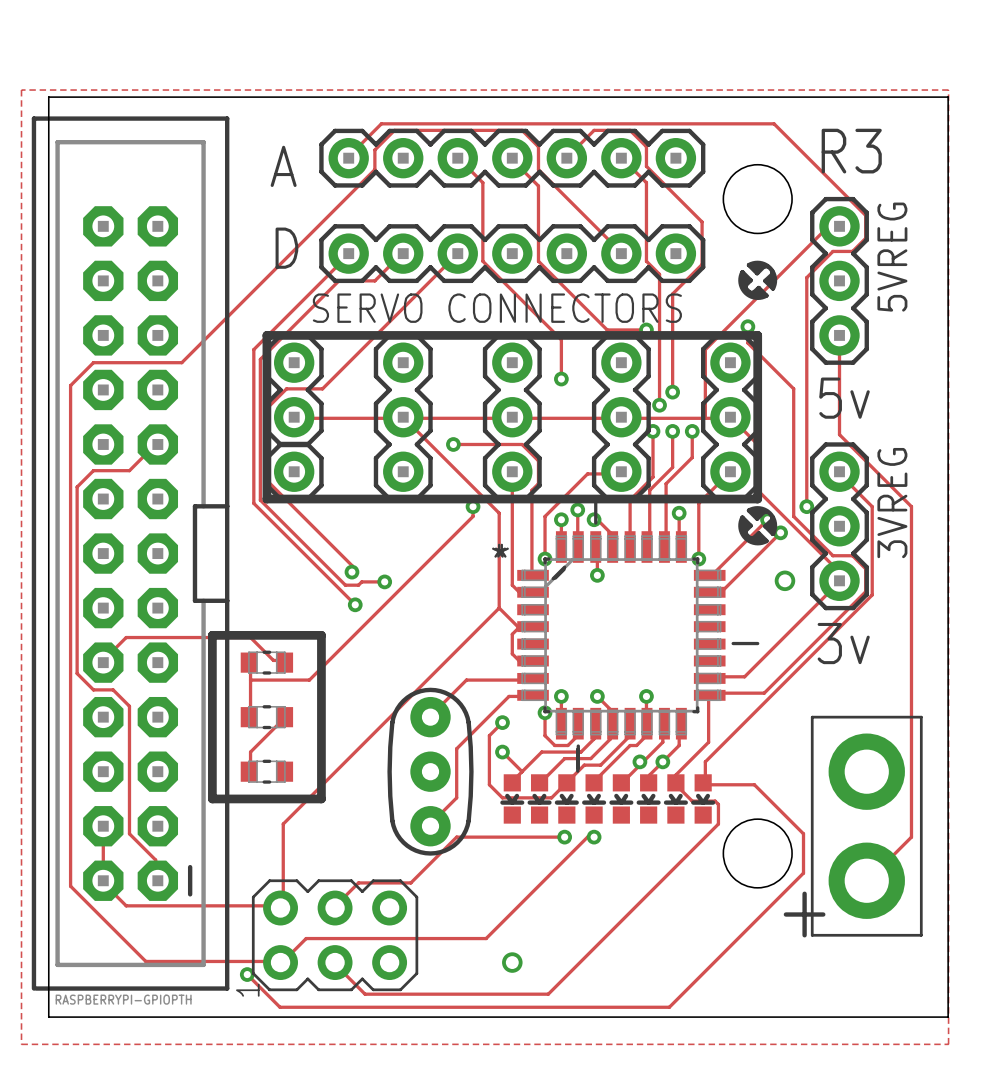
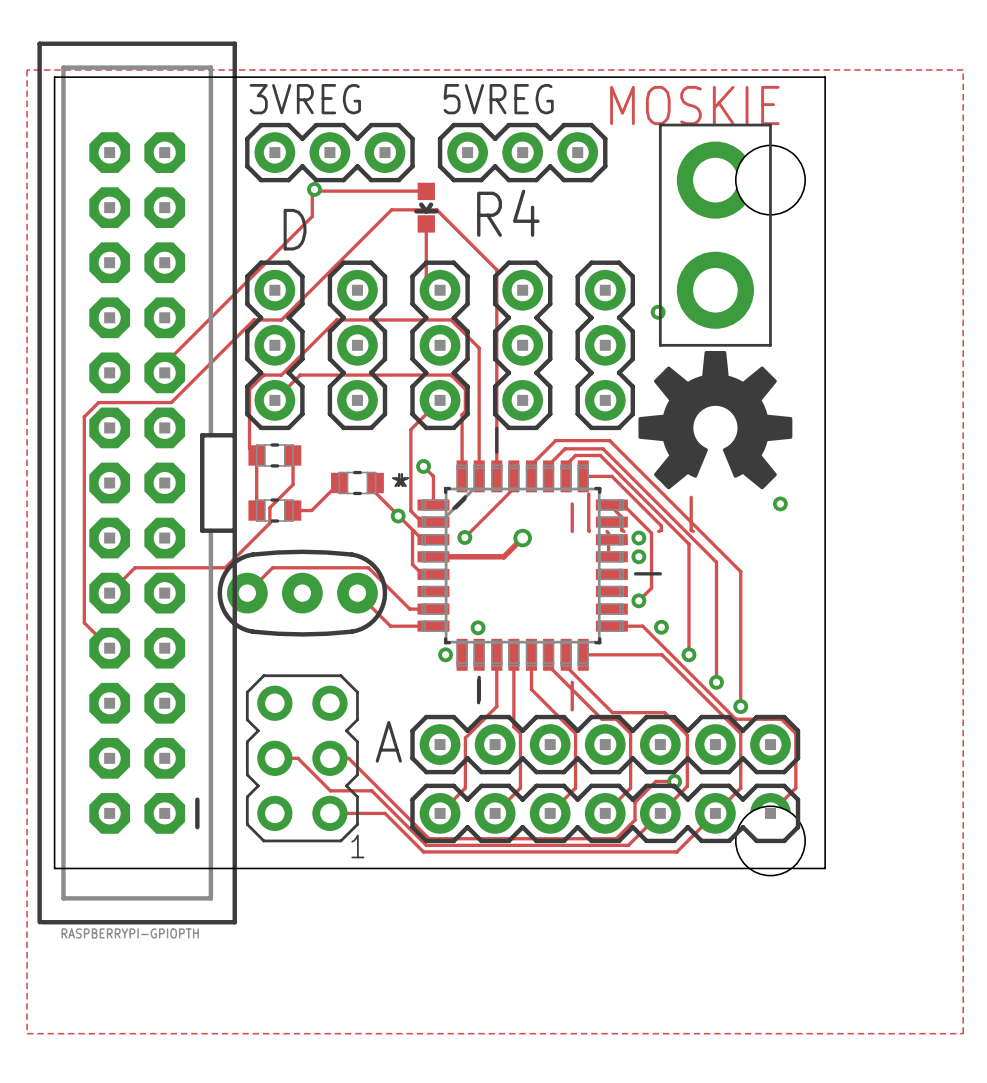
board edge: (811, 97) (948, 97) (948, 1017) (48, 1017) (48, 880) -> (825, 77) (825, 868) (54, 868)
text: none -> MOSKIE (694, 105)
text: R3 (851, 151) -> none
track: (348, 158) (381, 123) (774, 123) (865, 215) (865, 238) (852, 251) (832, 251) (806, 277) (806, 506) -> none
track: (457, 158) (482, 182) (482, 261) (561, 339) (561, 379) -> none
track: (512, 158) (538, 186) (538, 261) (607, 329) (646, 329) -> none
part: (512, 158) -> none
track: (566, 158) (594, 130) (630, 130) (646, 146) (646, 166) (702, 221) (702, 264) (672, 293) (672, 392) -> none
track: (621, 158) (646, 182) (646, 261) (659, 274) (659, 405) -> none
text: A (283, 166) -> none
track: none -> (314, 189) (312, 192) (312, 216) (164, 364) (164, 372)
via: none -> (314, 189)
track: none -> (313, 191) (426, 191)
part: none -> (426, 207)
track: (839, 226) (839, 228) (826, 228) (705, 349) (705, 418) -> none
text: none -> R4 (508, 213)
track: none -> (426, 223) (426, 276) (440, 290)
track: (348, 253) (253, 349) (253, 503) (355, 604) -> none
track: (403, 253) (374, 280) (338, 280) (260, 359) (260, 500) (345, 585) (358, 585) (361, 581) (384, 581) -> none
track: (457, 253) (322, 388) (286, 388) (266, 408) (266, 480) (351, 565) (351, 572) -> none
part: (512, 253) -> none
track: (621, 253) (538, 169) (538, 146) (522, 130) (394, 130) (374, 150) (374, 169) (181, 362) (93, 362) (70, 385) (70, 886) (145, 961) (280, 962) (306, 938) (486, 938) (587, 837) (594, 837) -> none
part: none -> (715, 235)
5VREG name position: 5VREG (892, 257) -> 5VREG (498, 99)
drawing: [738, 260, 778, 301] -> none
5VREG rotation: 0° (839, 280) -> 90° clockwise (522, 152)
5VREG position: (839, 280) -> (522, 152)
text: SERVO CONNECTORS (497, 308) -> none
track: (747, 326) (747, 343) (793, 388) (793, 516) (832, 555) (852, 555) (865, 568) (865, 591) (764, 693) (711, 693) (708, 696) (708, 742) (675, 774) (675, 784) (692, 801) (715, 801) (718, 804) (718, 824) (548, 994) (365, 994) (335, 962) -> none
via: (747, 326) -> none
line: (266, 335) (266, 499) (757, 499) (757, 335) (266, 335) -> none
track: (839, 335) (839, 434) (911, 506) (911, 837) (866, 880) -> none
part: none -> (274, 345)
part: none -> (357, 345)
part: none -> (440, 345)
part: none -> (522, 345)
part: none -> (605, 345)
drawing: none -> [638, 350, 793, 490]
via: (561, 379) -> none
via: (672, 392) -> none
text: 5v (844, 398) -> none
via: (659, 405) -> none
track: none -> (274, 400) (300, 375) (451, 375) (465, 389) (465, 411) (462, 414) (462, 476)
track: (294, 417) (403, 417) (499, 513) (499, 608) -> none
part: (294, 417) -> none
part: (403, 417) -> none
track: none -> (440, 400) (410, 429) (410, 511) (421, 522) (433, 522)
part: (512, 417) -> none
part: (621, 417) -> none
part: (730, 417) -> none
track: (404, 418) (730, 417) (757, 444) (757, 490) (839, 572) (839, 581) (744, 676) (711, 676) (709, 678) -> none
track: (653, 431) (653, 477) (630, 500) (630, 547) -> none
via: (653, 431) -> none
track: (672, 431) (672, 467) (649, 490) (649, 541) -> (583, 476) (611, 476) (661, 525)
via: (672, 431) -> none
track: (692, 431) (692, 457) (666, 483) (666, 545) (664, 547) -> none
via: (692, 431) -> none
track: (157, 444) (129, 470) (93, 470) (77, 487) (77, 673) (93, 689) (113, 689) (129, 706) (129, 833) (155, 860) (155, 879) (157, 880) -> none
line: (280, 444) (307, 444) -> none
track: (453, 444) (522, 444) (538, 460) (538, 483) (531, 490) (533, 575) -> none
via: (453, 444) -> none
part: none -> (274, 455)
track: none -> (293, 455) (293, 484) (269, 507) (269, 523) (225, 567) (134, 567) (109, 593)
track: (512, 471) (512, 585) (518, 591) (533, 592) -> none
track: (621, 471) (620, 473) (587, 473) (545, 516) (545, 559) -> none
track: (730, 471) (698, 503) (698, 559) -> none
track: (839, 471) (872, 506) (872, 595) (705, 761) (705, 781) (703, 782) (705, 784) (754, 784) (803, 833) (803, 873) (669, 1007) (279, 1007) (247, 974) -> none
track: none -> (423, 466) (433, 476) (433, 505)
via: none -> (423, 466)
track: none -> (479, 476) (479, 348) (451, 319) (336, 319) (281, 375) (263, 375) (249, 389) (249, 448) (256, 455) (256, 510)
track: none -> (513, 476) (513, 488) (464, 537)
track: none -> (531, 476) (531, 464) (555, 440) (609, 440) (740, 571) (740, 706)
track: none -> (548, 476) (548, 465) (565, 448) (603, 448) (716, 562) (716, 682)
track: none -> (566, 476) (566, 464) (575, 455) (600, 455) (688, 544) (688, 654)
track: none -> (339, 482) (311, 510) (293, 510)
part: none -> (357, 482)
track: none -> (375, 482) (375, 492) (422, 539) (433, 539)
3VREG name position: 3VREG (892, 503) -> 3VREG (305, 99)
track: (473, 506) (473, 516) (309, 680) (250, 680) -> none
via: (473, 506) -> none
drawing: [738, 506, 778, 546] -> none
via: (806, 506) -> none
via: (577, 509) -> none
via: (679, 513) -> none
via: (561, 519) -> none
via: (594, 519) -> none
track: (767, 519) (711, 575) (709, 575) -> none
track: none -> (611, 505) (623, 505) (651, 533) (651, 588) (638, 600)
part: none -> (274, 510)
3VREG rotation: 0° (839, 526) -> 90° clockwise (329, 152)
3VREG position: (839, 526) -> (329, 152)
via: none -> (398, 516)
track: (780, 532) (721, 591) (709, 592) -> none
via: (780, 532) -> none
track: none -> (413, 530) (412, 564) (422, 574) (433, 574)
part position: (130, 553) -> (137, 482)
via: none -> (464, 537)
track: none -> (522, 538) (503, 556) (433, 556)
via: none -> (522, 538)
via: none -> (638, 538)
via: (545, 559) -> none
via: (698, 559) -> none
via: (351, 572) -> none
via: none -> (638, 556)
via: (597, 575) -> none
via: (784, 580) -> none
via: (384, 581) -> none
via: (355, 604) -> none
track: none -> (247, 593) (272, 567) (368, 567) (409, 609) (433, 609)
track: none -> (357, 593) (390, 626) (433, 626)
track: (499, 608) (518, 627) -> none
track: (499, 608) (283, 824) (283, 905) (280, 908) (279, 905) (126, 905) (103, 882) (103, 826) -> none
via: none -> (638, 600)
track: (518, 627) (512, 634) (512, 653) (518, 660) (533, 660) -> none
line: (212, 635) (212, 798) (321, 798) (321, 635) (212, 635) -> none
part position: (638, 635) -> (539, 565)
track: none -> (611, 626) (642, 626) (735, 719) (781, 719) (795, 733) (795, 788) (770, 813)
via: none -> (661, 627)
via: none -> (478, 627)
text: 3v (843, 643) -> none
track: (103, 662) (126, 637) (250, 637) (273, 660) (283, 660) (284, 662) -> (109, 648) (84, 622) (84, 416) (98, 402) (171, 402) (253, 319) (281, 319) (391, 209) (436, 209) (496, 269) (496, 476)
track: (248, 662) (250, 663) (250, 716) (248, 717) -> none
part: (266, 662) -> none
via: none -> (445, 654)
track: none -> (513, 654) (513, 726) (520, 733) (520, 788) (495, 813)
track: none -> (531, 654) (531, 689) (575, 733) (575, 788) (550, 813)
track: none -> (548, 654) (548, 665) (601, 719) (616, 719) (630, 733) (630, 788) (605, 813)
track: none -> (566, 654) (566, 666) (612, 712) (664, 712) (687, 735) (687, 786) (628, 845) (426, 845) (371, 790) (330, 790) (297, 758) (274, 758)
track: none -> (583, 654) (661, 654) (740, 733) (740, 788) (676, 851) (423, 851) (385, 813) (329, 813)
via: none -> (688, 654)
track: (533, 678) (531, 680) (466, 680) (430, 717) -> none
track: (533, 695) (509, 696) (456, 748) (456, 797) (430, 826) -> (496, 654) (496, 706) (465, 737) (465, 788) (440, 813)
via: (561, 696) -> none
track: (597, 696) (610, 709) (610, 722) (612, 723) (610, 725) (610, 738) (590, 758) (564, 758) (539, 782) -> none
via: (597, 696) -> none
track: (646, 696) (646, 735) (636, 745) (630, 745) (594, 782) -> none
via: (646, 696) -> none
via: none -> (716, 682)
track: (545, 712) (545, 735) (554, 745) (567, 745) (577, 735) (578, 723) -> none
via: (545, 712) -> none
part: (266, 717) -> none
track: (284, 717) (250, 752) (250, 771) (248, 771) -> none
via: none -> (740, 706)
track: (502, 722) (489, 735) (489, 784) (502, 797) (551, 797) (584, 765) (600, 765) (630, 735) (630, 723) -> none
via: (502, 722) -> none
track: (595, 723) (594, 738) (581, 752) (541, 752) (512, 782) -> none
track: (664, 723) (662, 742) (621, 782) -> none
track: (681, 723) (679, 725) (679, 745) (649, 774) (648, 782) -> none
track: (502, 752) (522, 771) -> none
via: (502, 752) -> none
text: none -> A (388, 741)
part: none -> (605, 744)
via: (639, 761) -> none
via: (662, 761) -> none
part: (266, 771) -> none
part: none -> (302, 758)
track: none -> (329, 758) (348, 758) (429, 838) (616, 838) (635, 820) (635, 802) (655, 781) (674, 781)
part rotation: 0° (430, 771) -> 90° clockwise (302, 593)
part position: (430, 771) -> (302, 593)
via: none -> (674, 781)
part: (512, 798) -> none
part: (539, 798) -> none
part: (566, 798) -> none
part: (594, 798) -> none
part: (621, 798) -> none
part: (648, 798) -> none
part: (675, 798) -> none
part: (703, 798) -> none
part: none -> (605, 813)
part: (866, 826) -> none
track: (564, 837) (456, 837) (410, 882) (358, 882) (335, 908) -> none
via: (564, 837) -> none
via: (594, 837) -> none
text: + (804, 914) -> none
part: (335, 935) -> none
via: (512, 962) -> none
via: (247, 974) -> none

